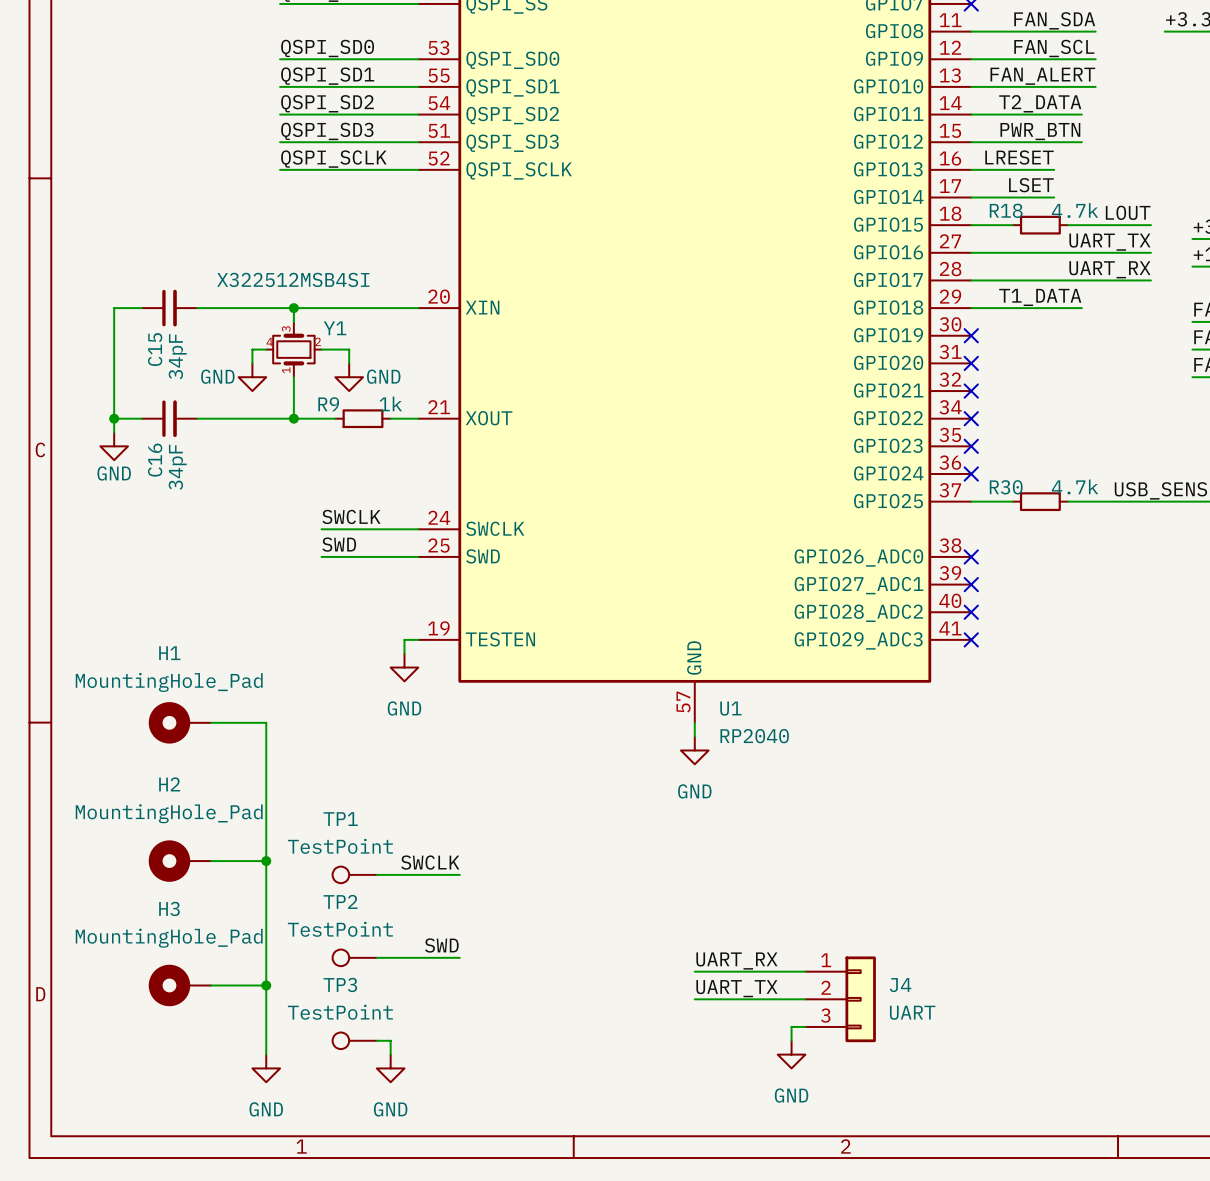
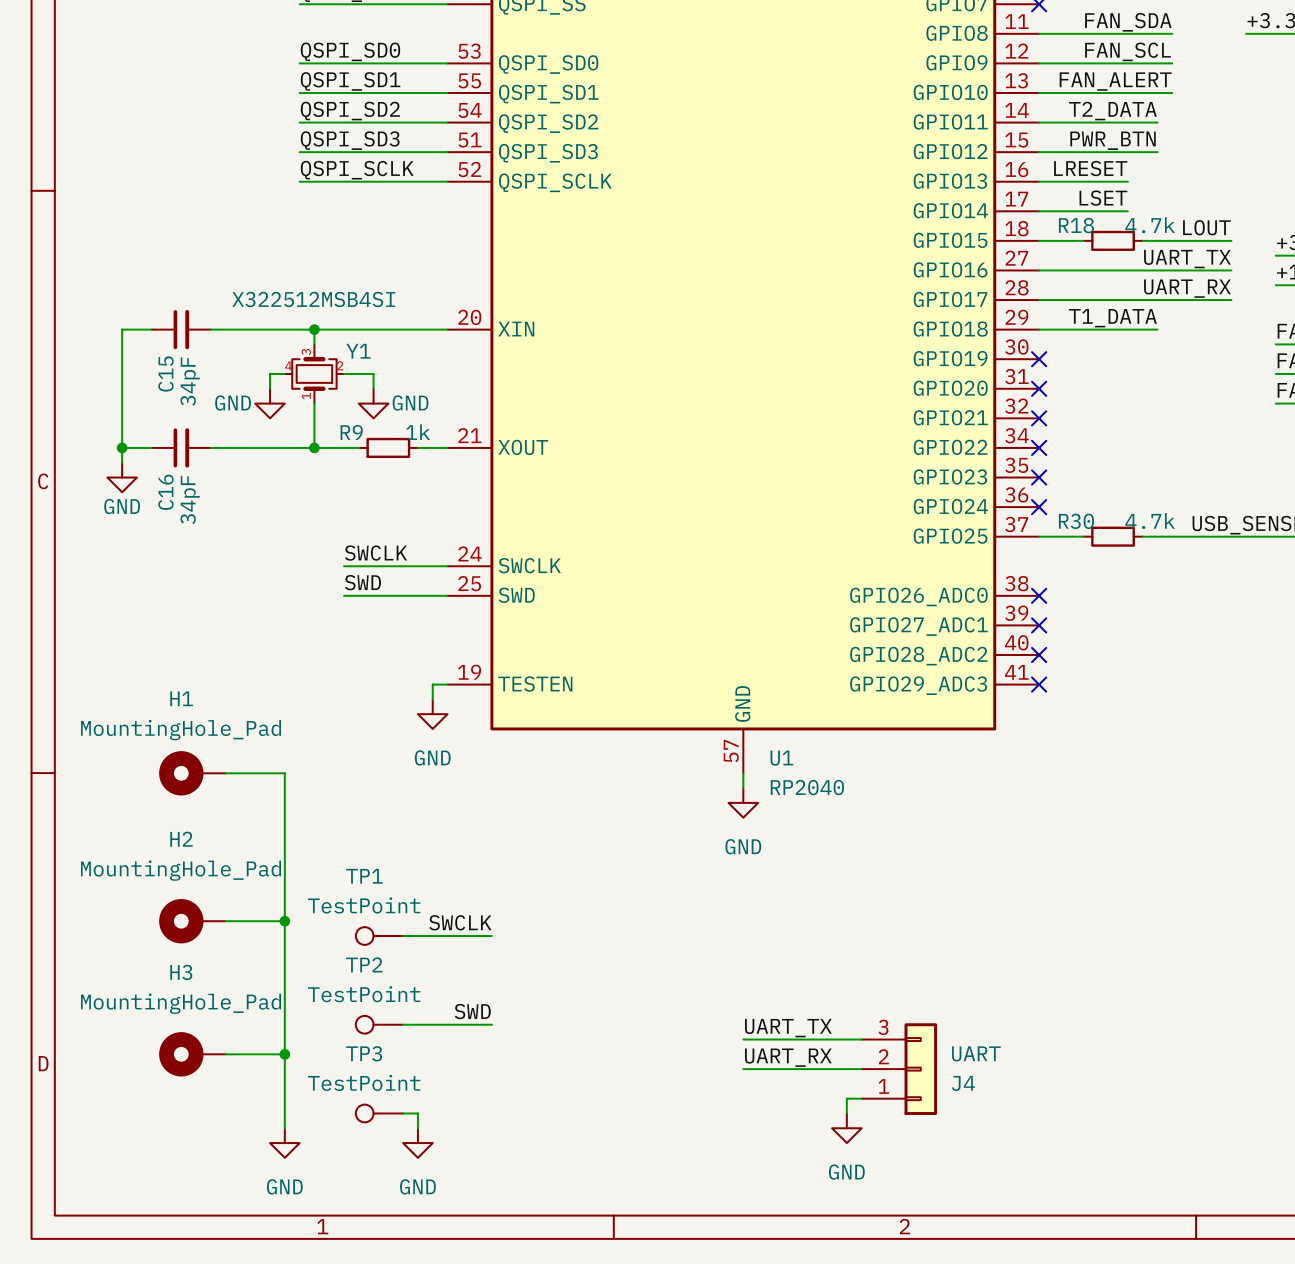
label: UART_RX (736, 961) -> UART_TX (788, 1028)
label: UART_TX (736, 988) -> UART_RX (788, 1057)
J4 flip: as is (860, 999) -> up-down (920, 1069)

